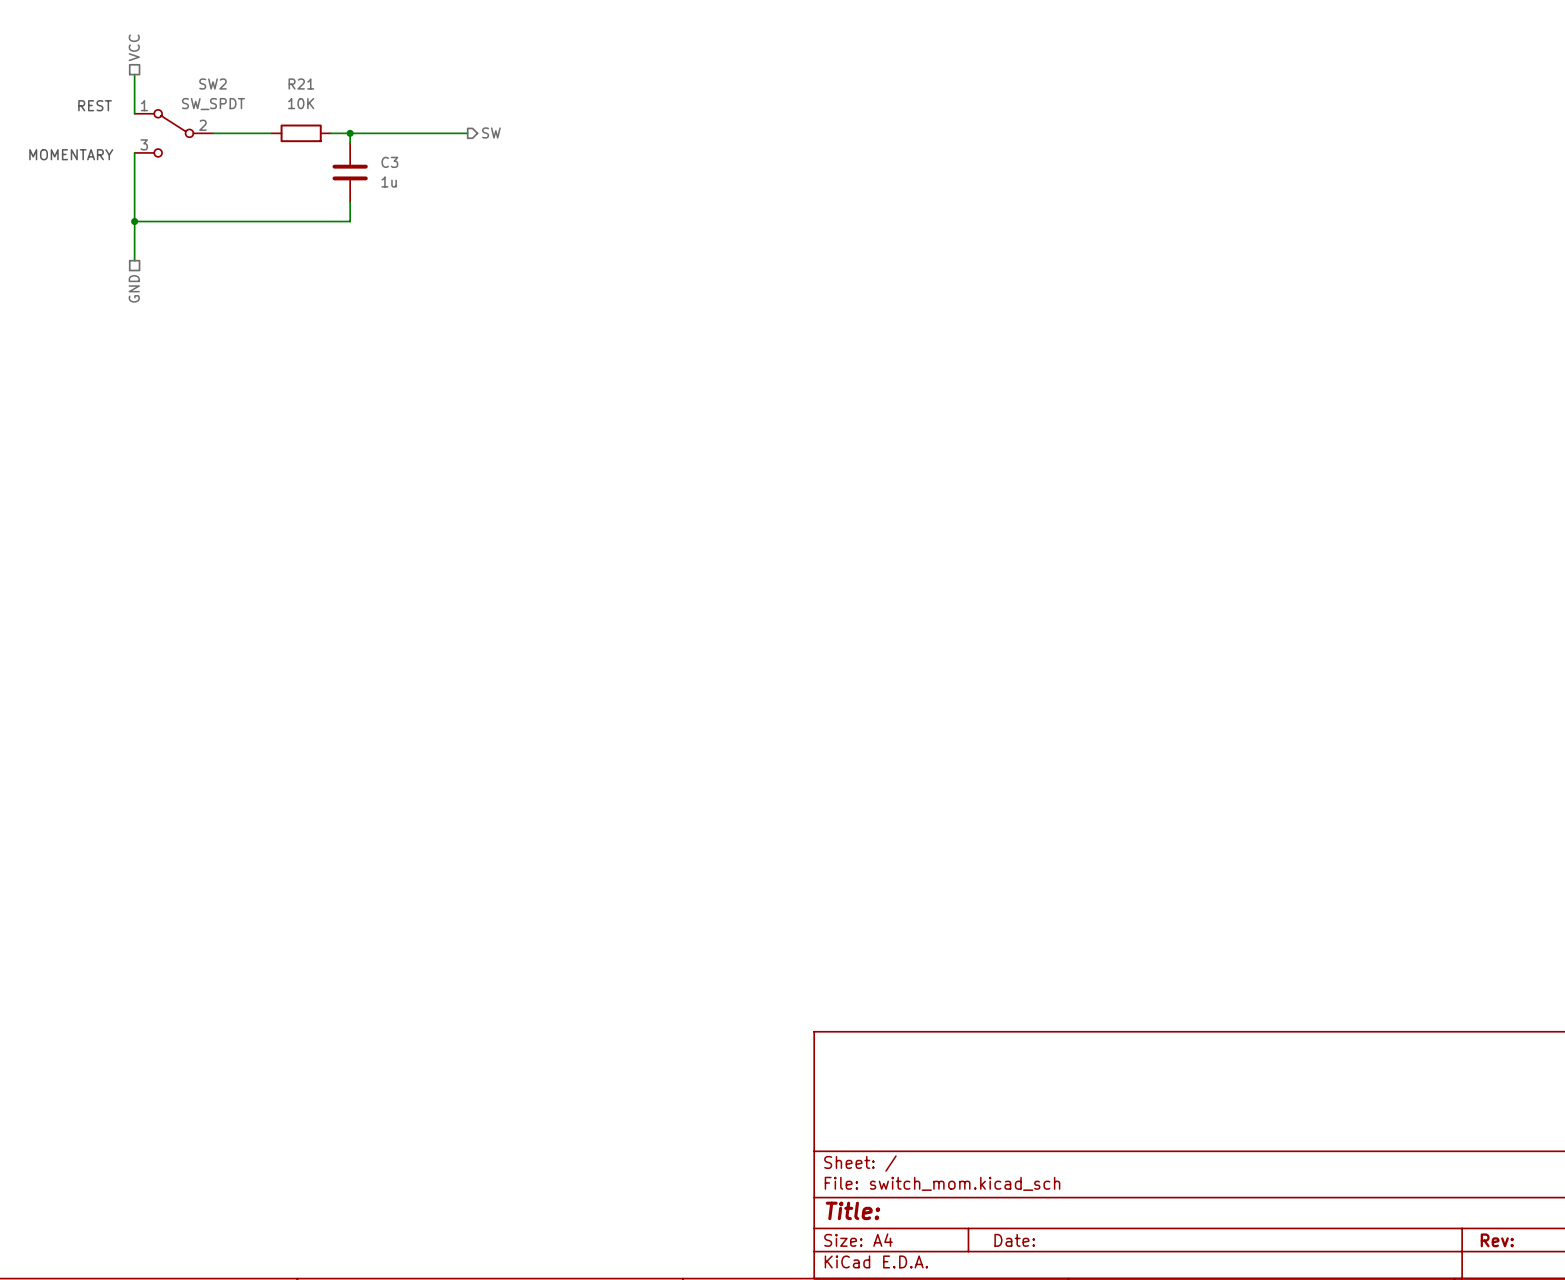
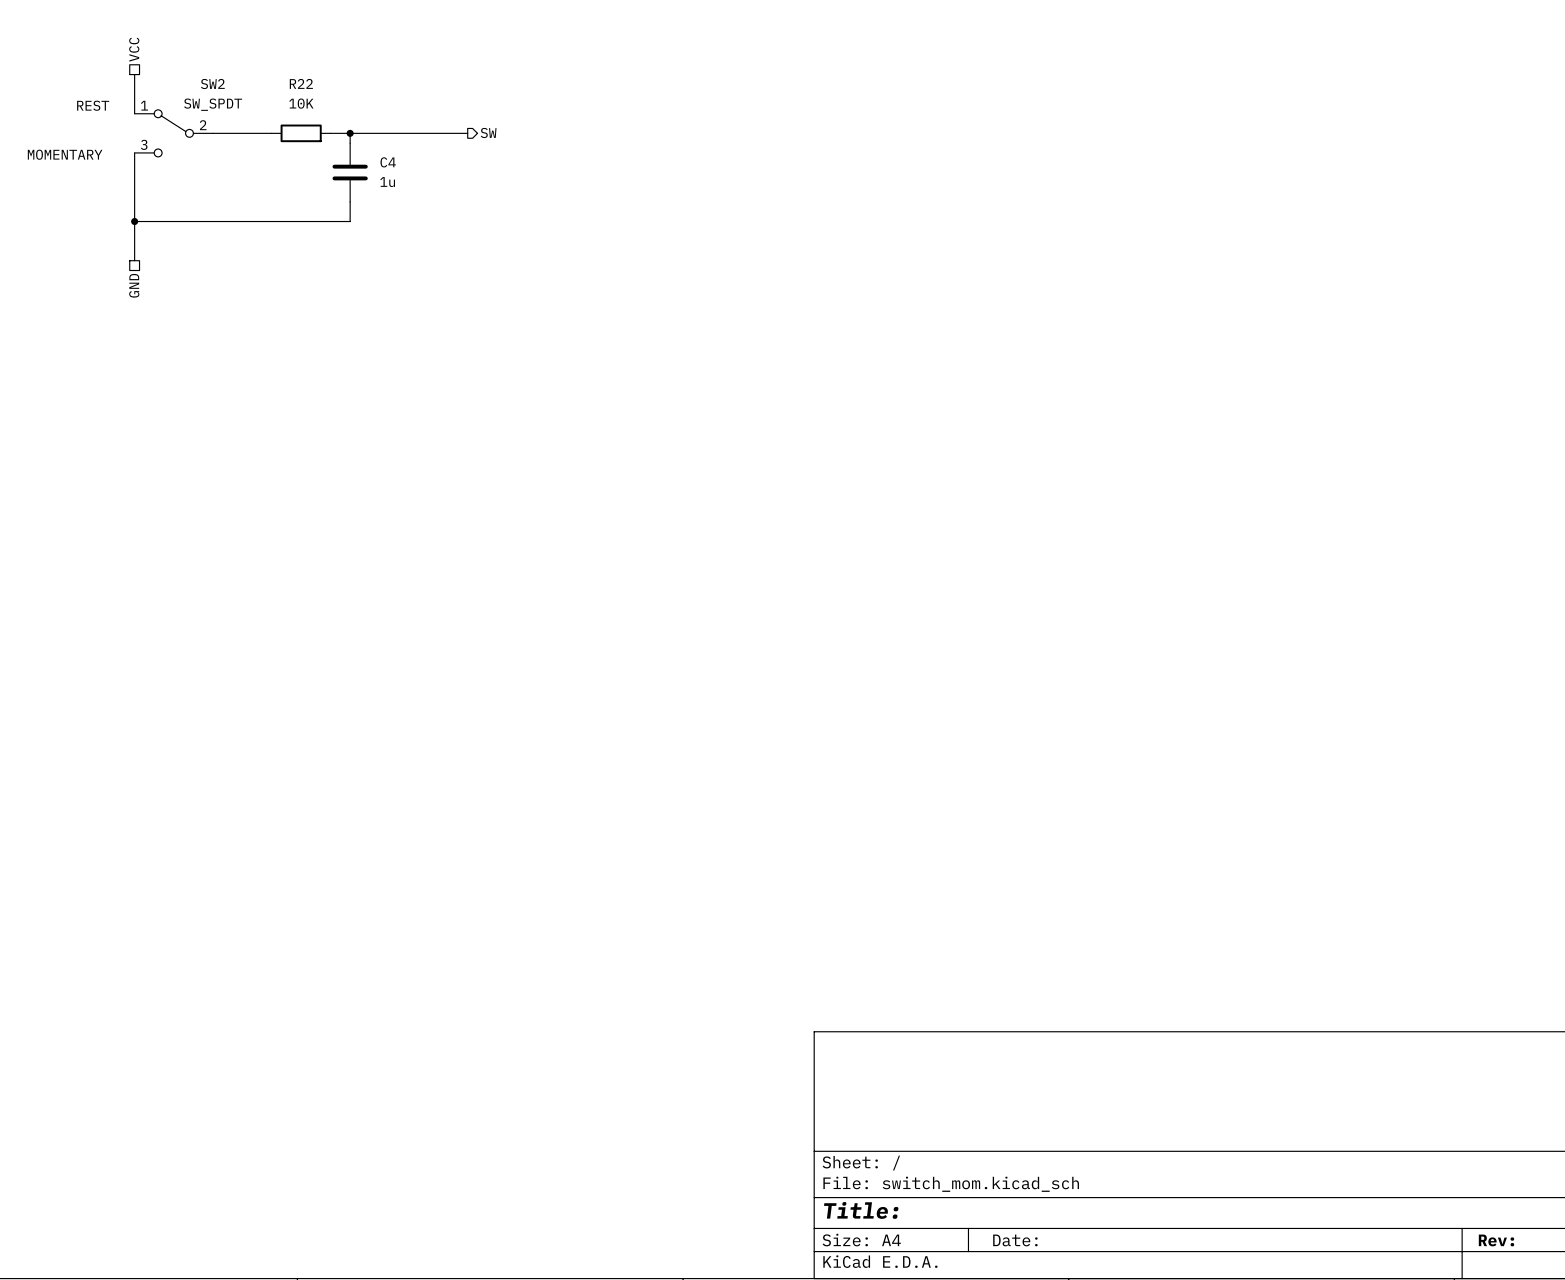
R21 name: R21 (301, 84) -> R22 (301, 83)
C3 name: C3 (389, 162) -> C4 (388, 162)

